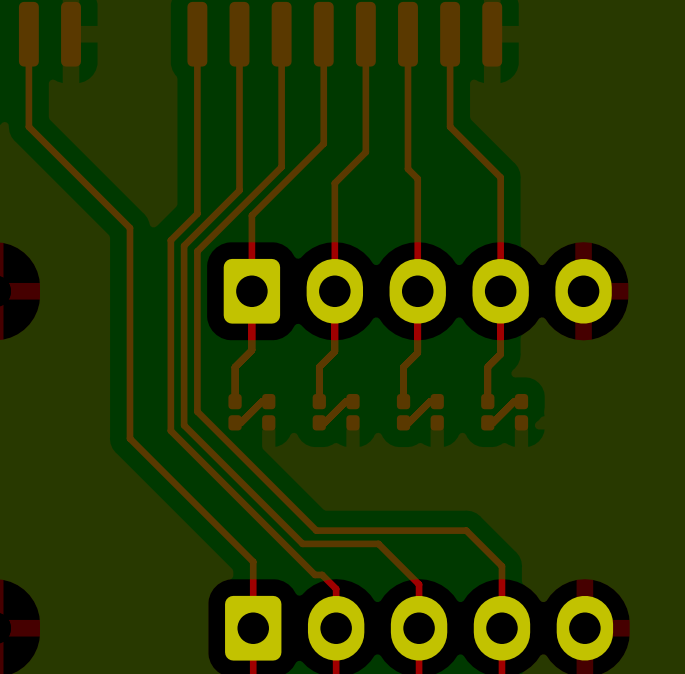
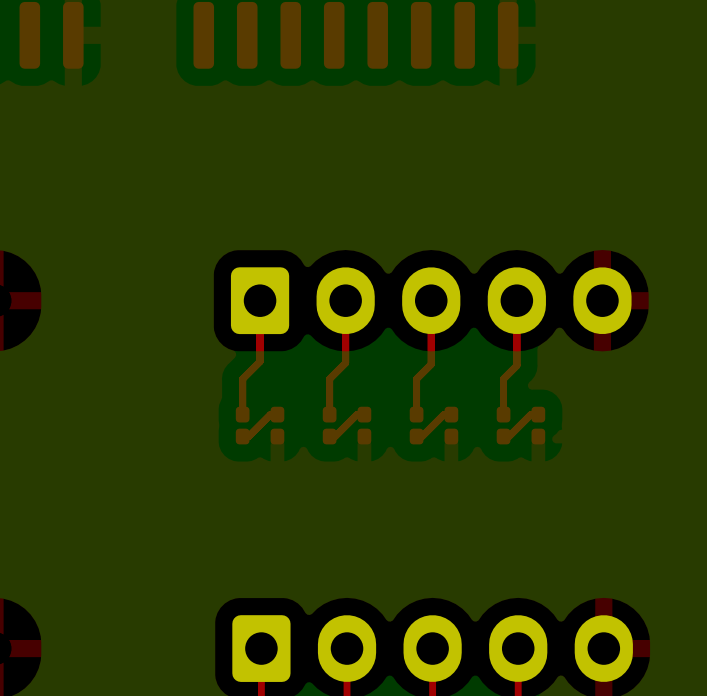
top track: (28, 34) (28, 126) (129, 227) (129, 438) (253, 561) (253, 628) -> none
top track: (197, 34) (197, 213) (170, 240) (170, 430) (314, 574) (322, 574) (336, 588) (336, 628) -> none
top track: (239, 34) (239, 190) (184, 245) (184, 425) (302, 543) (378, 543) (419, 584) (419, 628) -> none
top track: (281, 34) (281, 167) (197, 251) (197, 411) (316, 530) (466, 530) (501, 566) (501, 628) -> none
top track: (323, 34) (323, 143) (251, 215) (251, 291) -> none
top track: (365, 34) (365, 152) (334, 183) (334, 291) -> none
top track: (407, 34) (407, 169) (417, 178) (417, 291) -> none
top track: (450, 34) (450, 126) (500, 177) (500, 291) -> none

